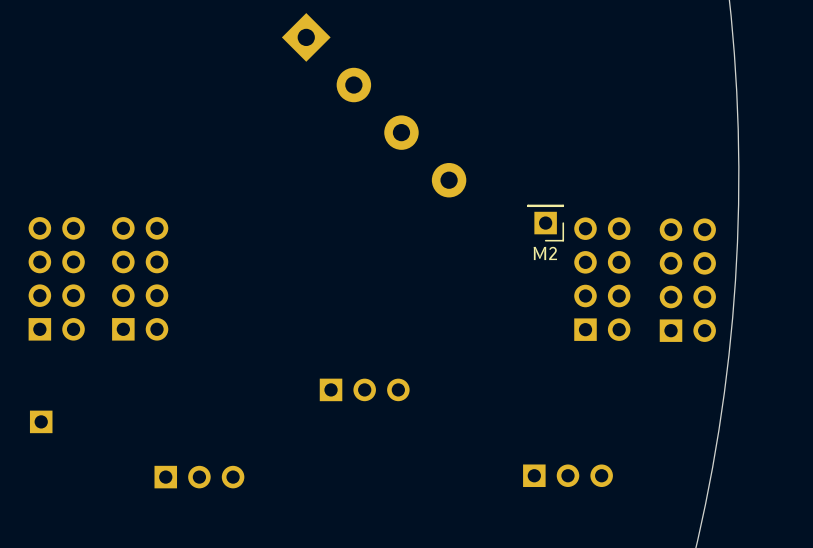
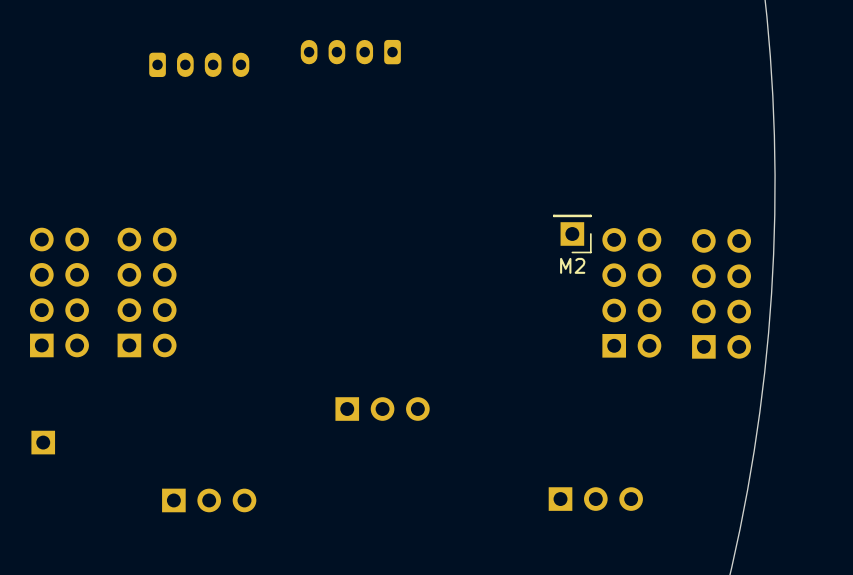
part: none -> (350, 52)
part: none -> (199, 64)
part: (374, 105) -> none

